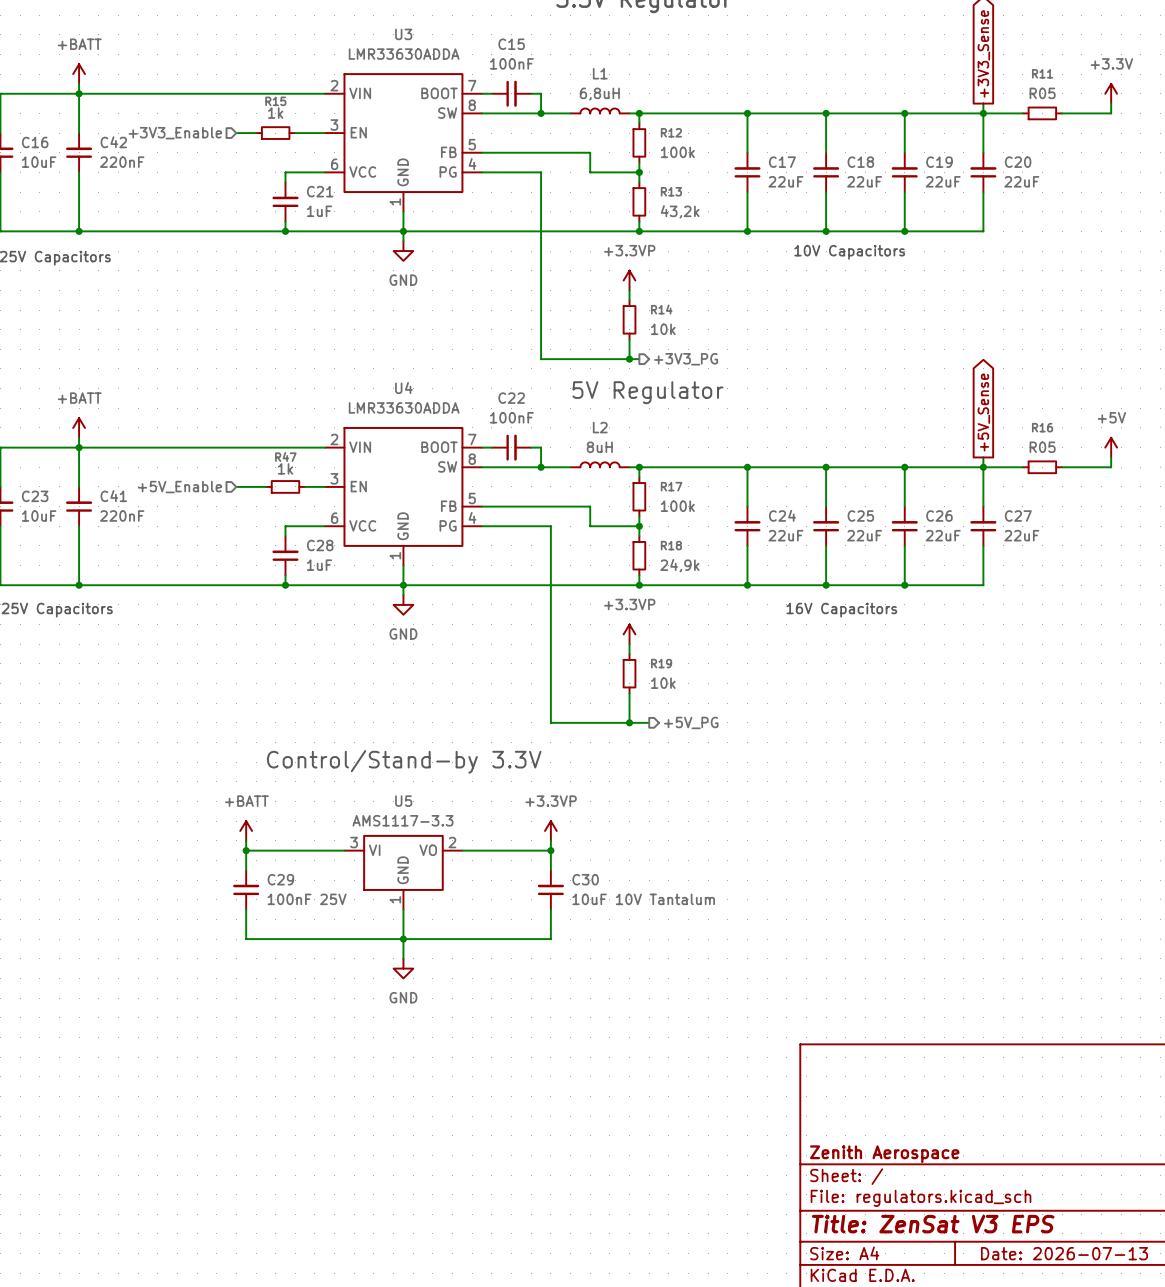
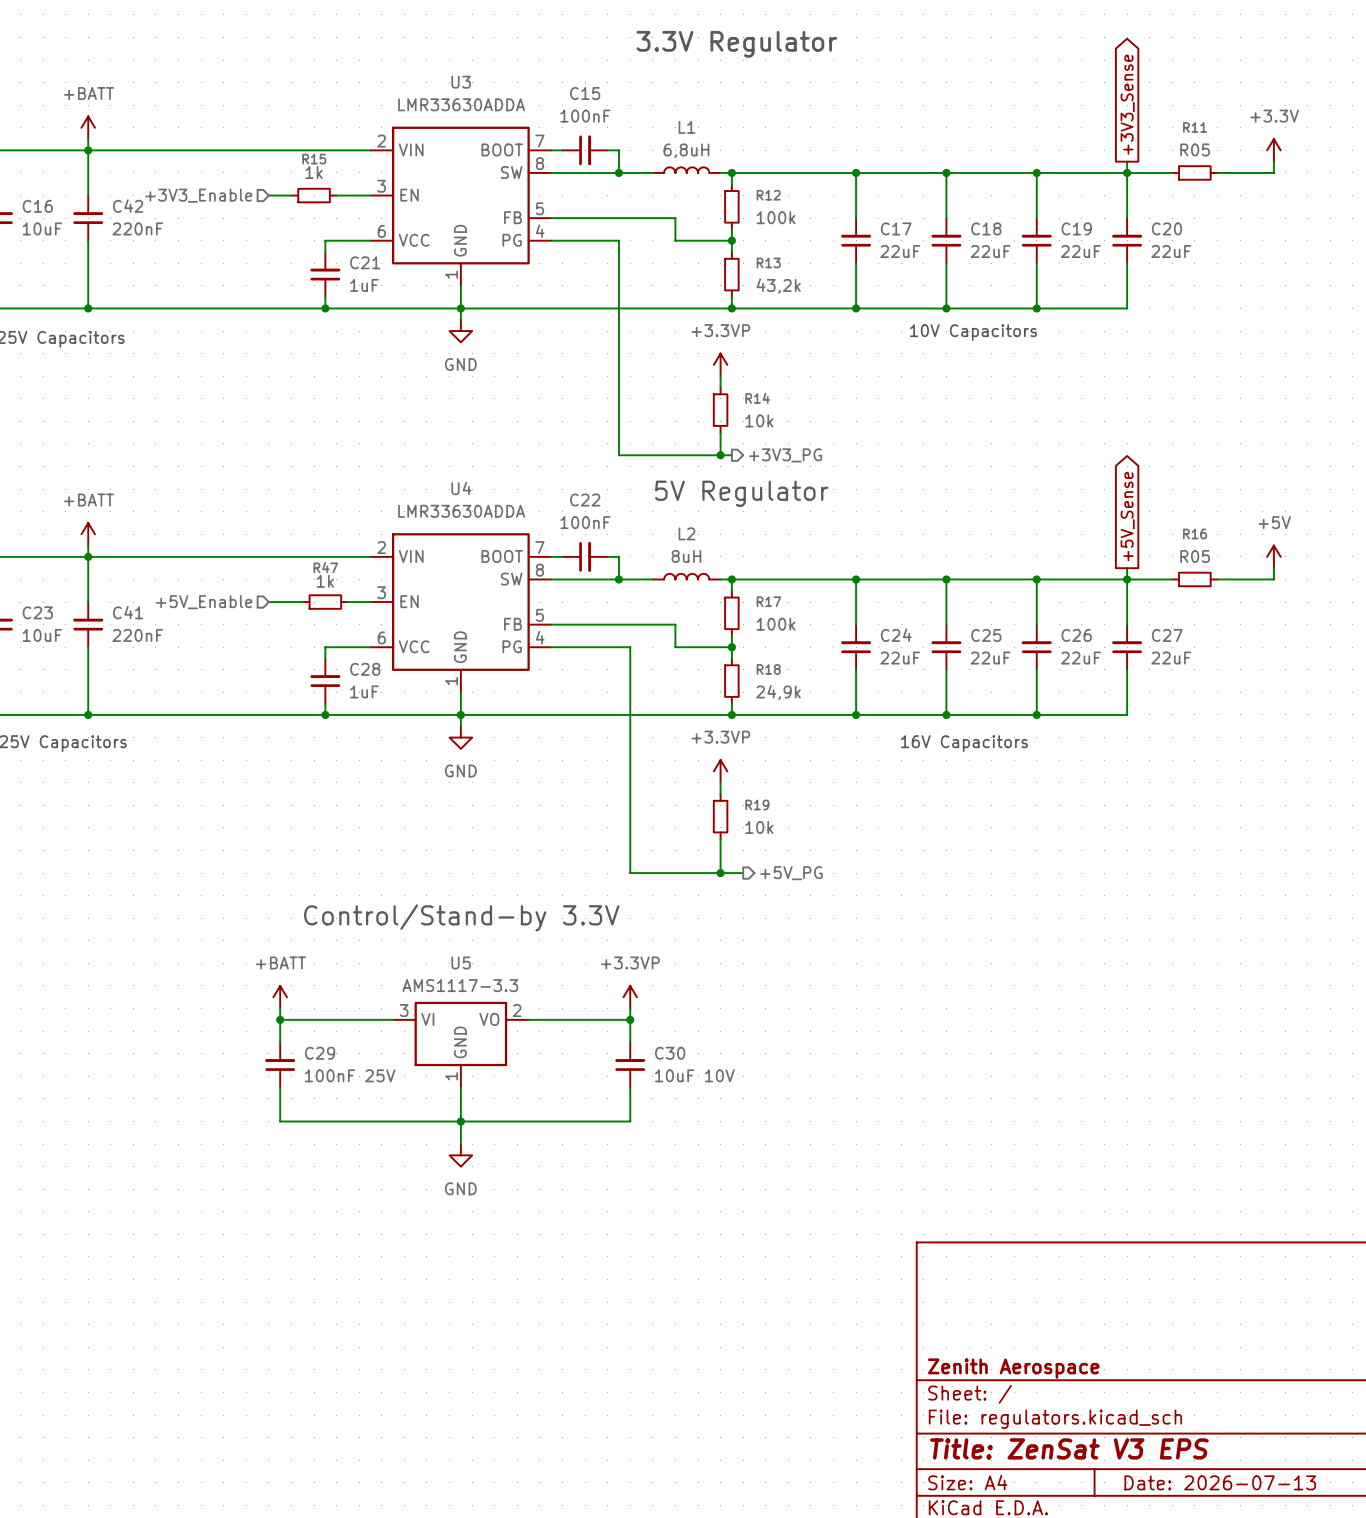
C30 value: 10uF 10V Tantalum (643, 899) -> 10uF 10V (694, 1075)

